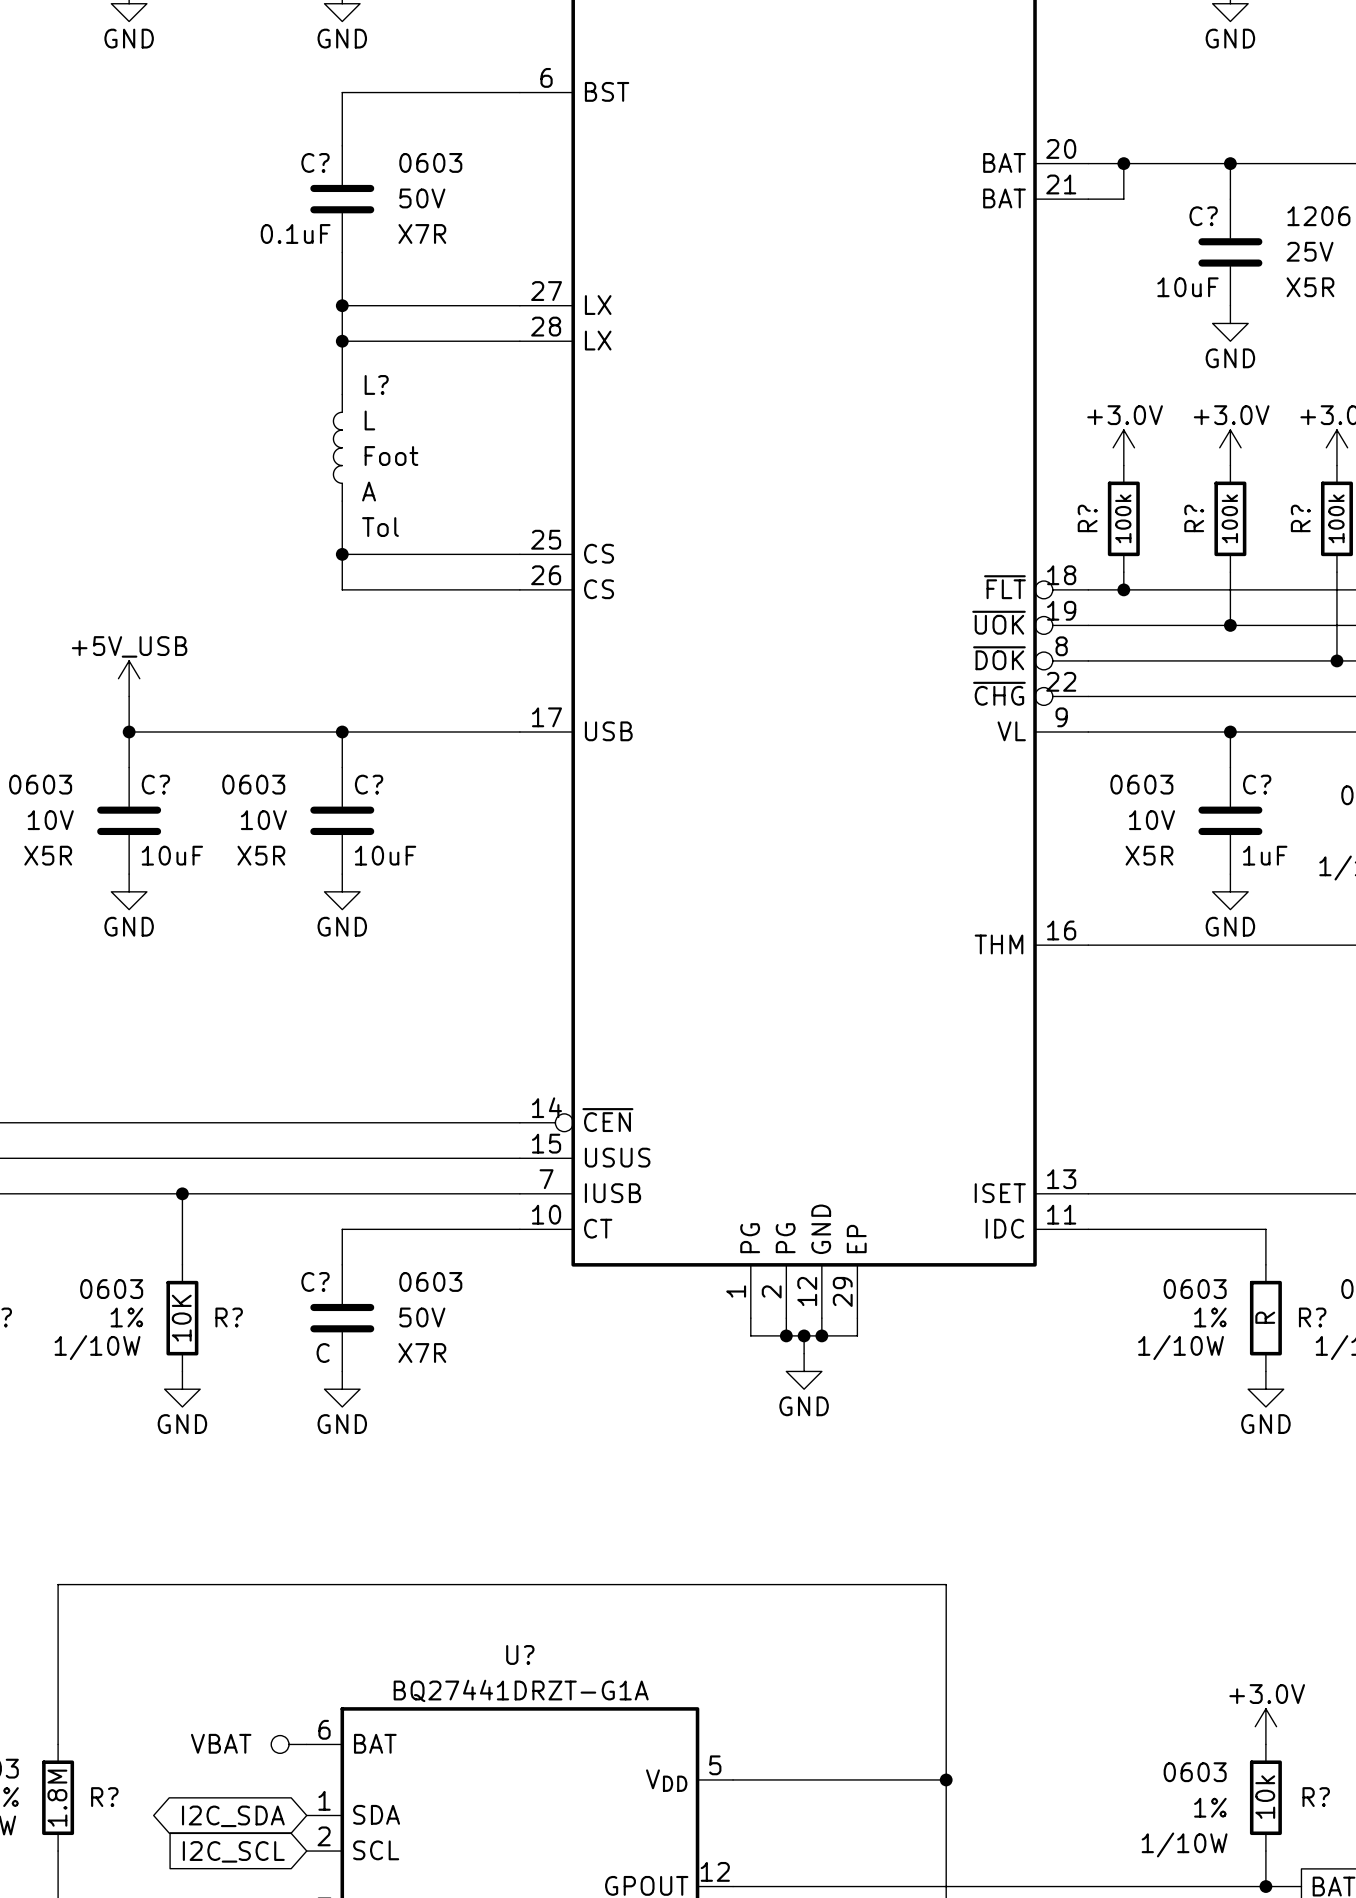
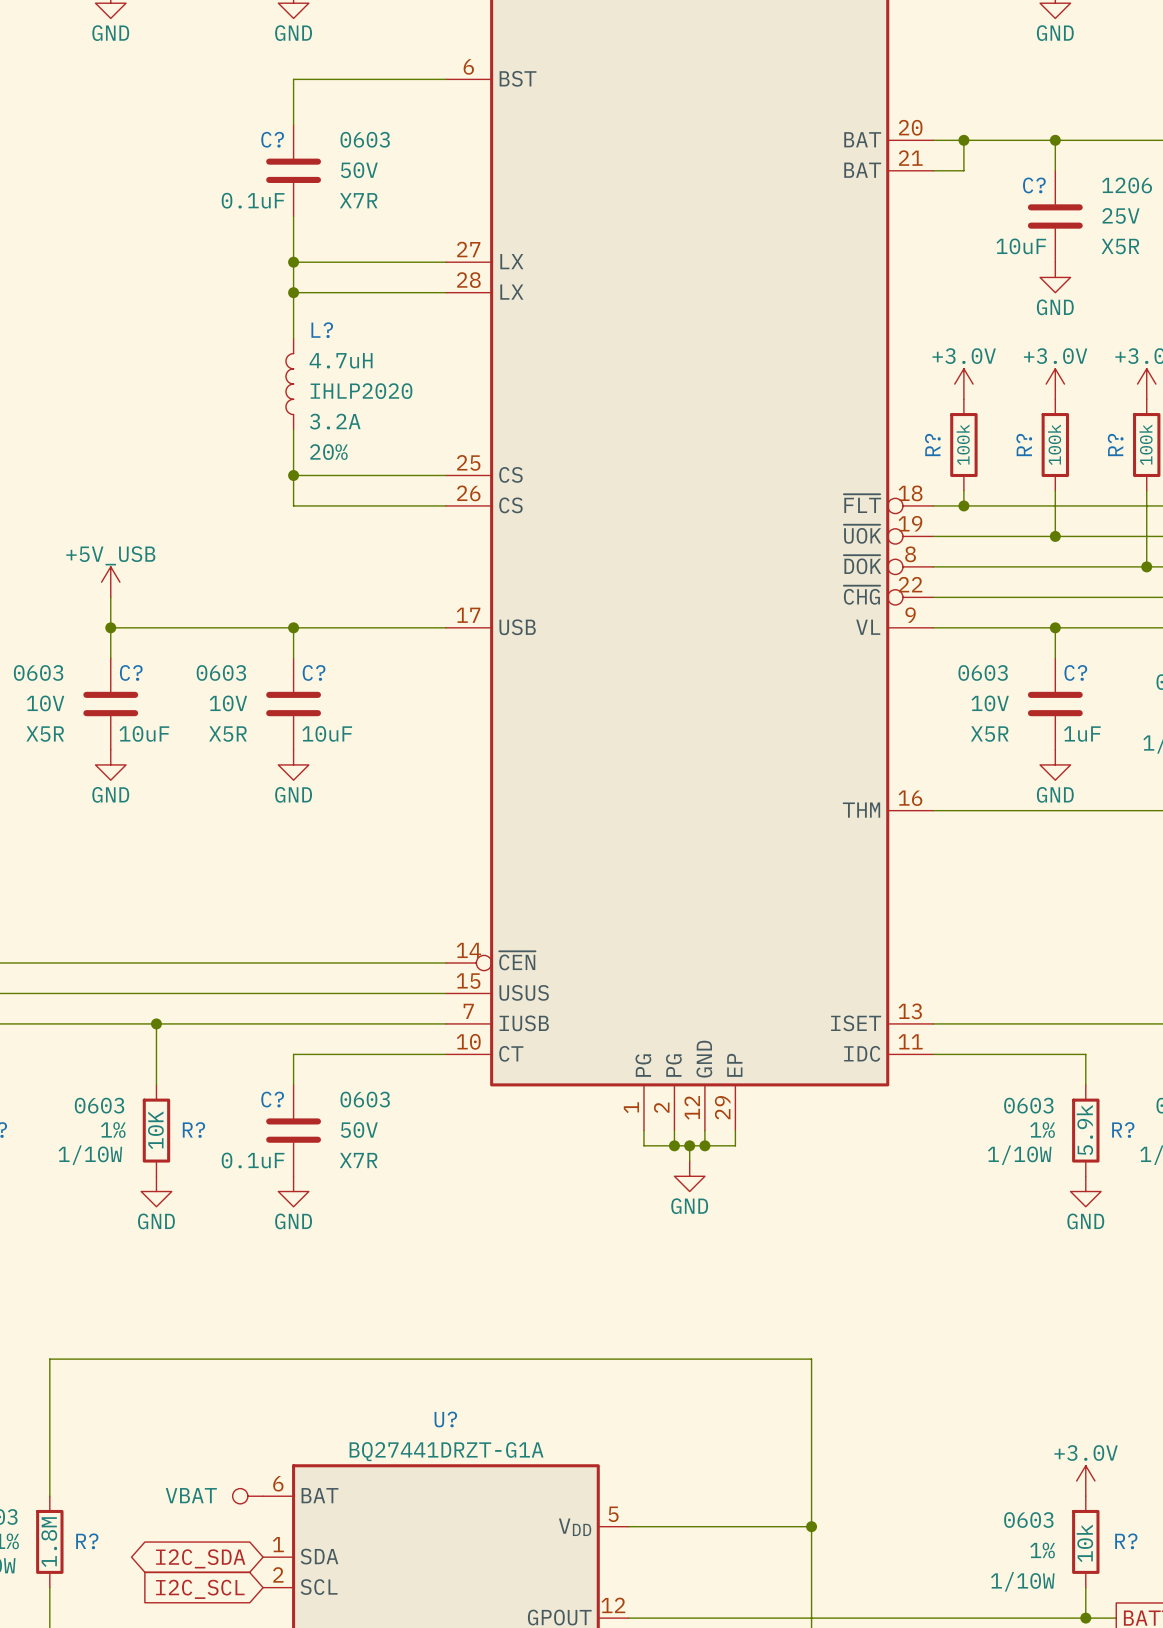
L? value: L (369, 420) -> 4.7uH (341, 360)
L? text: Foot (391, 456) -> IHLP2020 (361, 391)
L? text: A (369, 491) -> 3.2A (335, 421)
L? text: Tol (380, 527) -> 20% (328, 452)
R? value: R (1265, 1317) -> 5.9k (1084, 1130)
C? value: C (323, 1353) -> 0.1uF (253, 1160)

